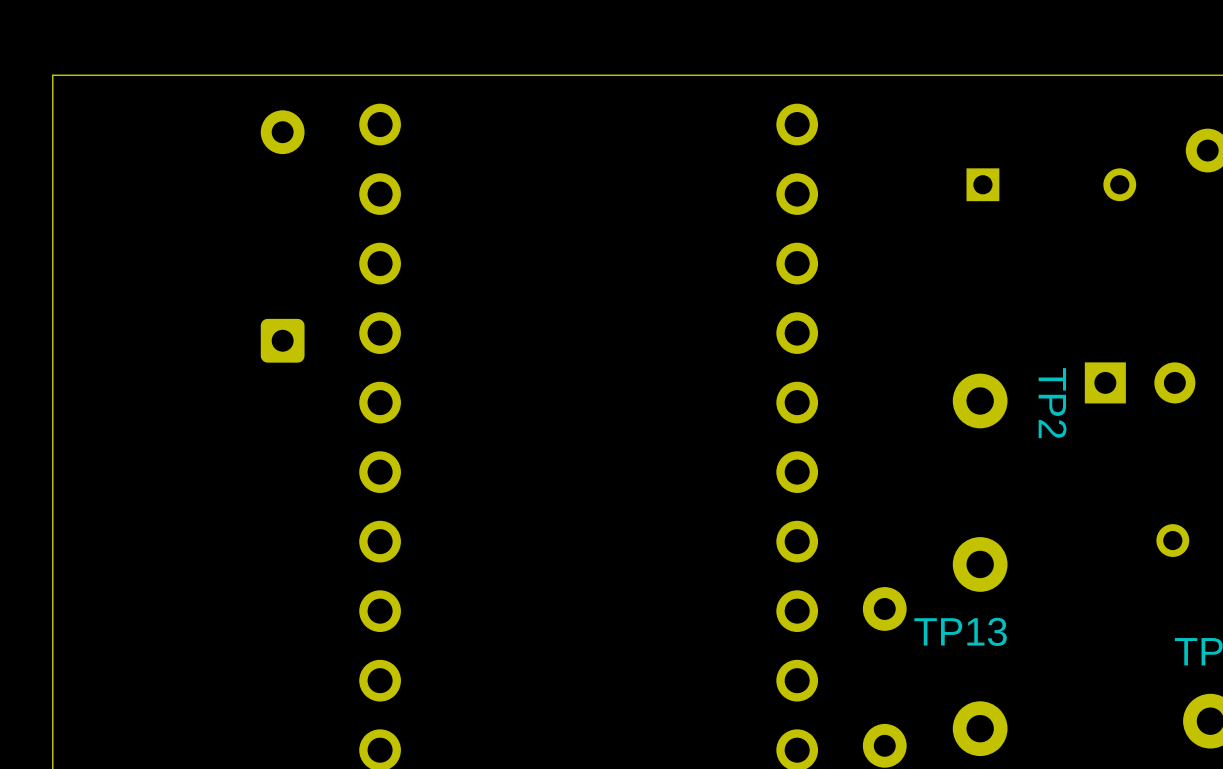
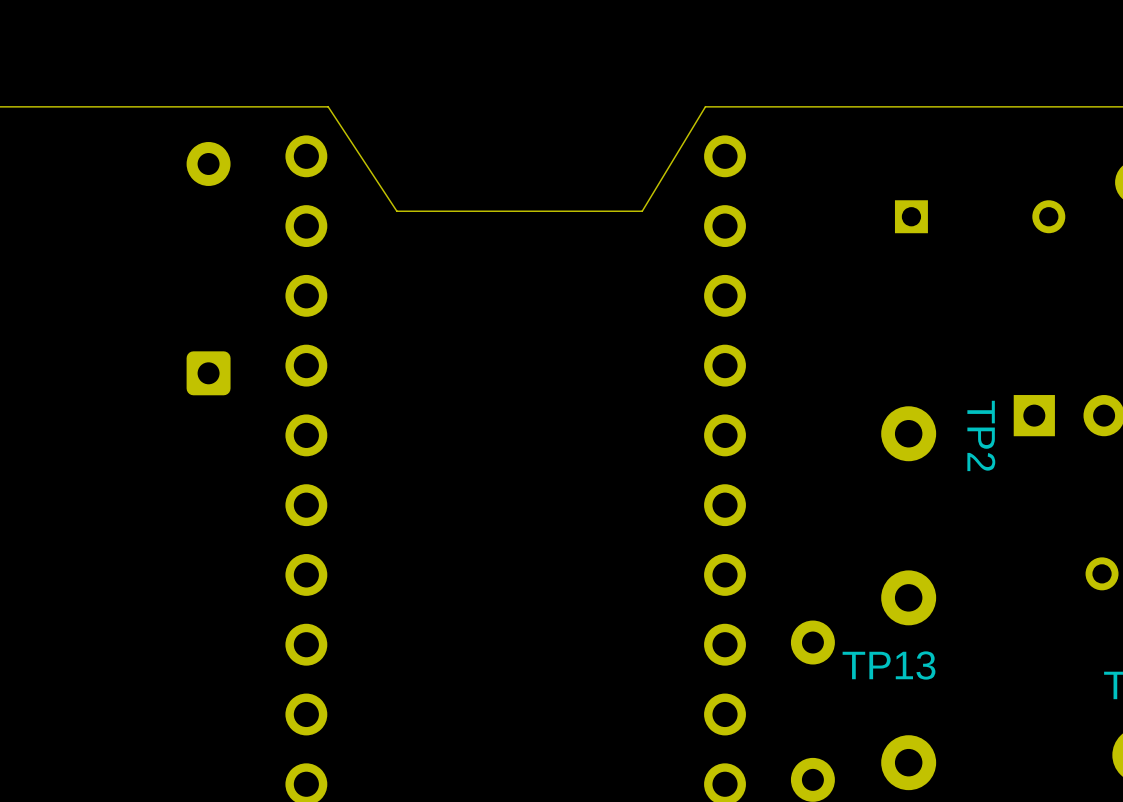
board edge: (777, 75) (401, 75) -> (705, 106) (642, 211) (396, 211) (328, 106)

